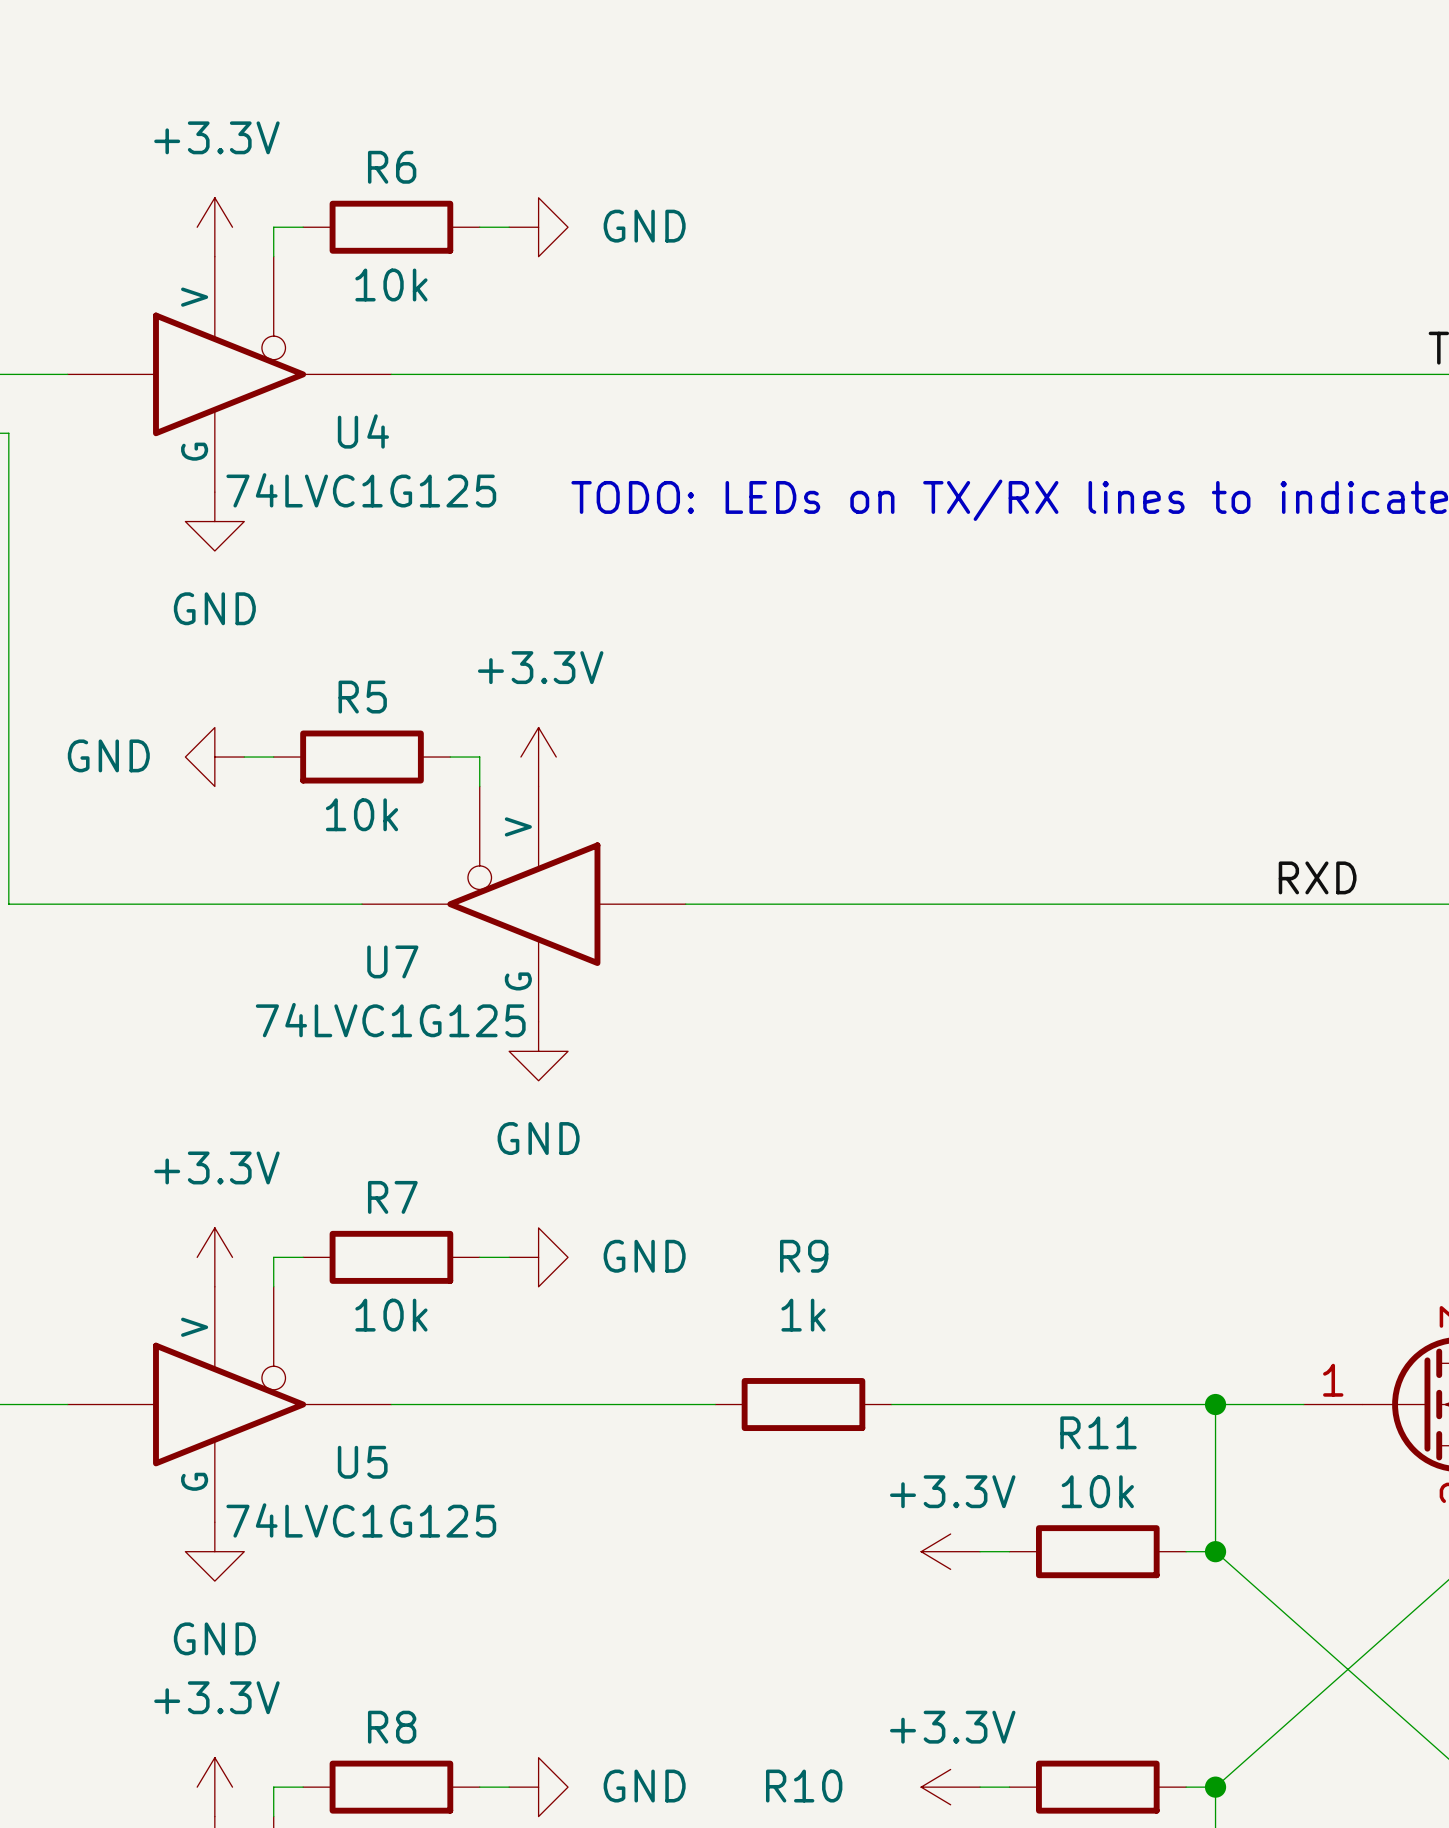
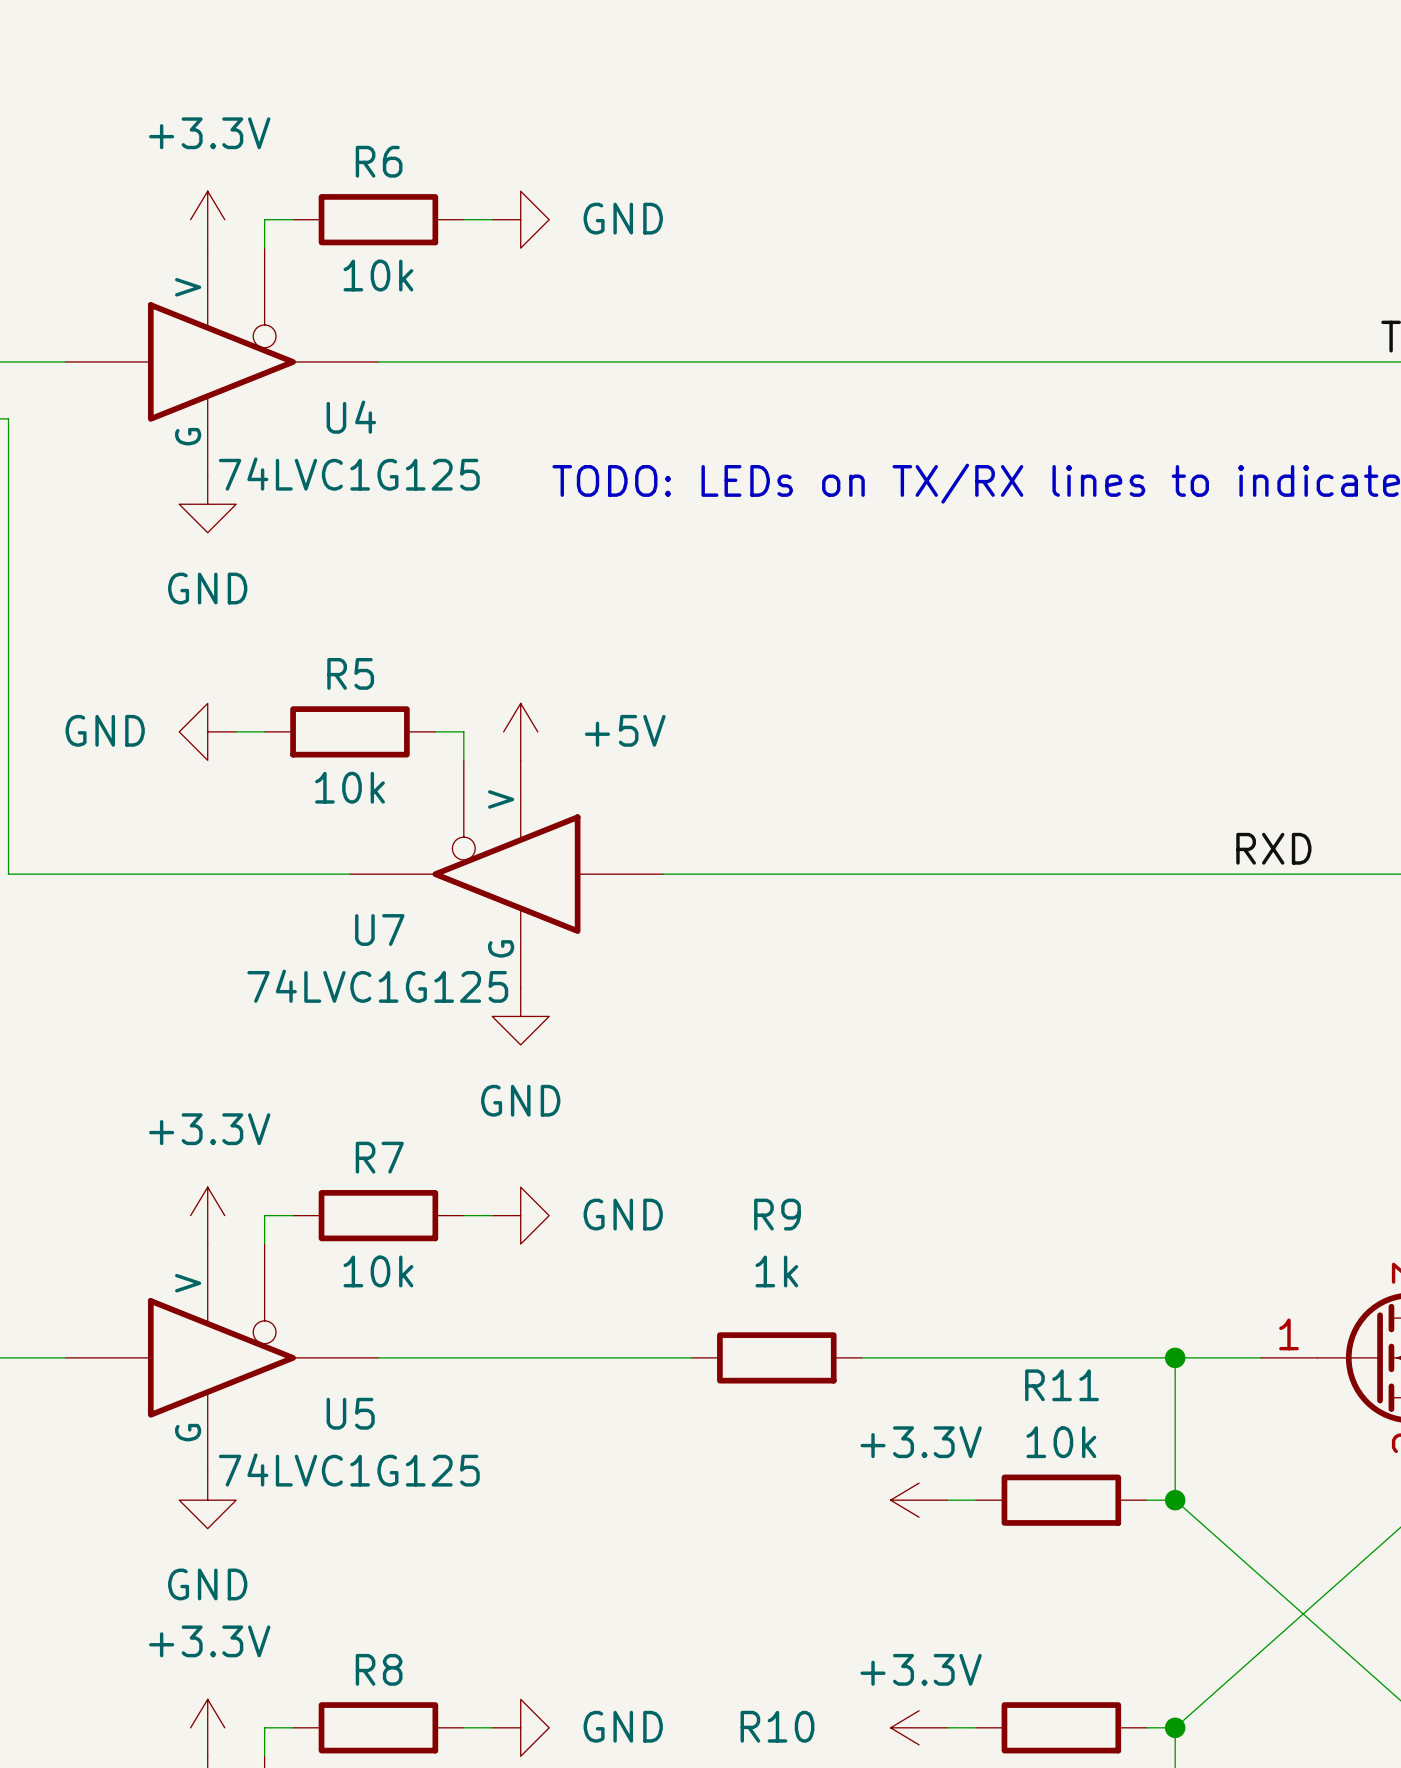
power symbol: +3.3V (538, 757) -> +5V (520, 731)

